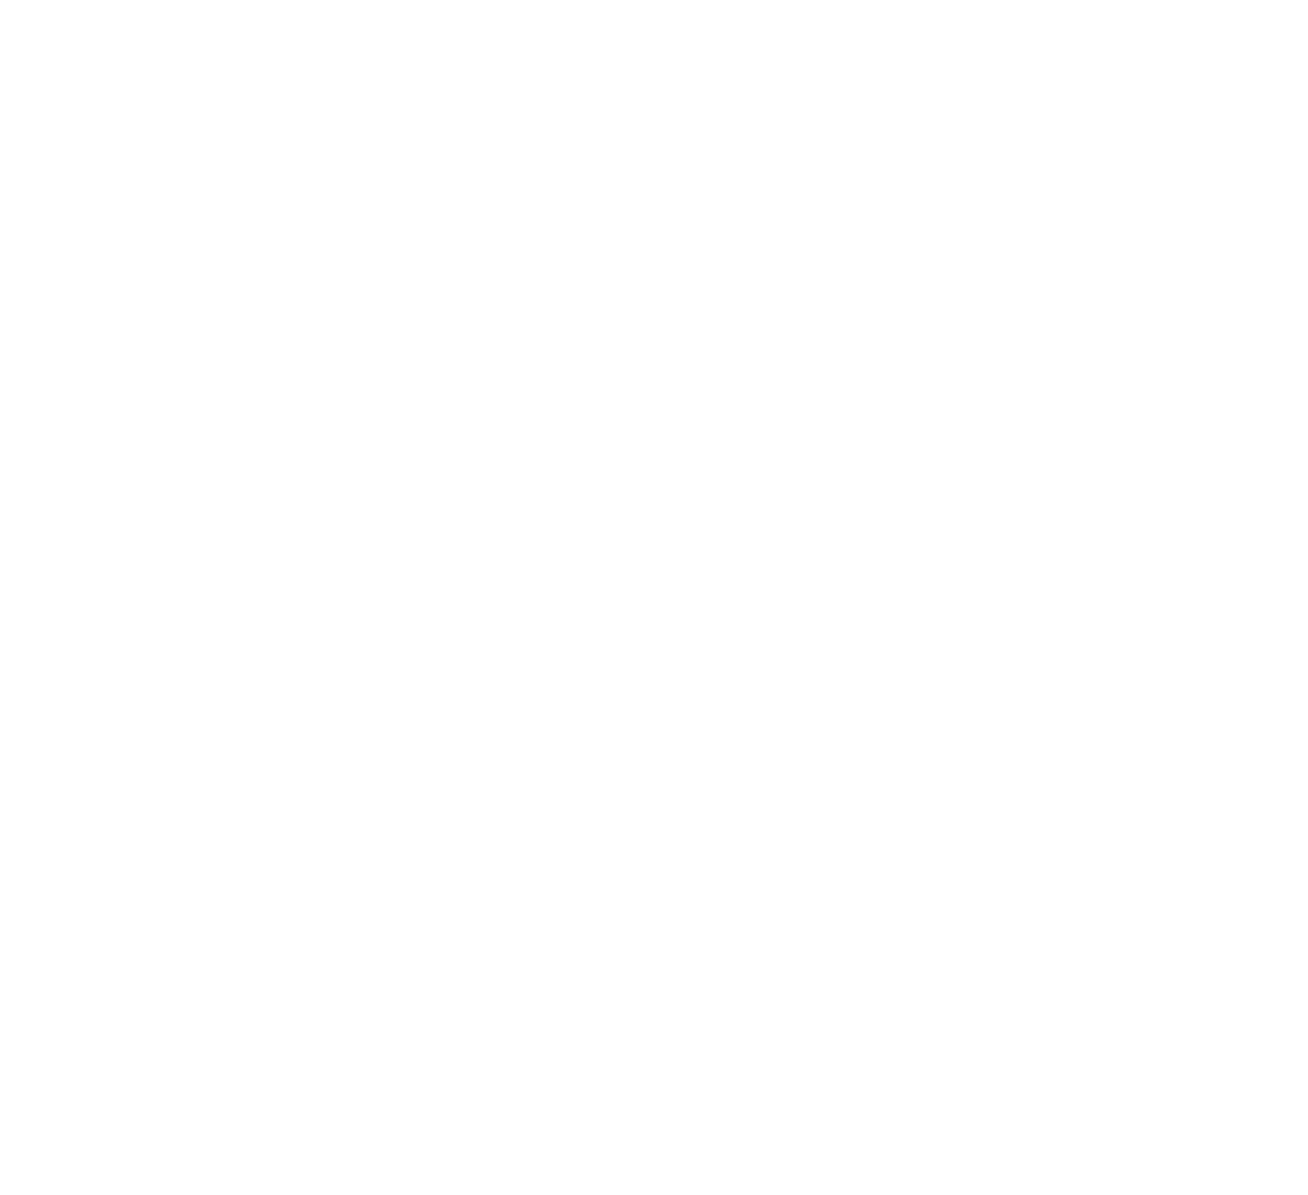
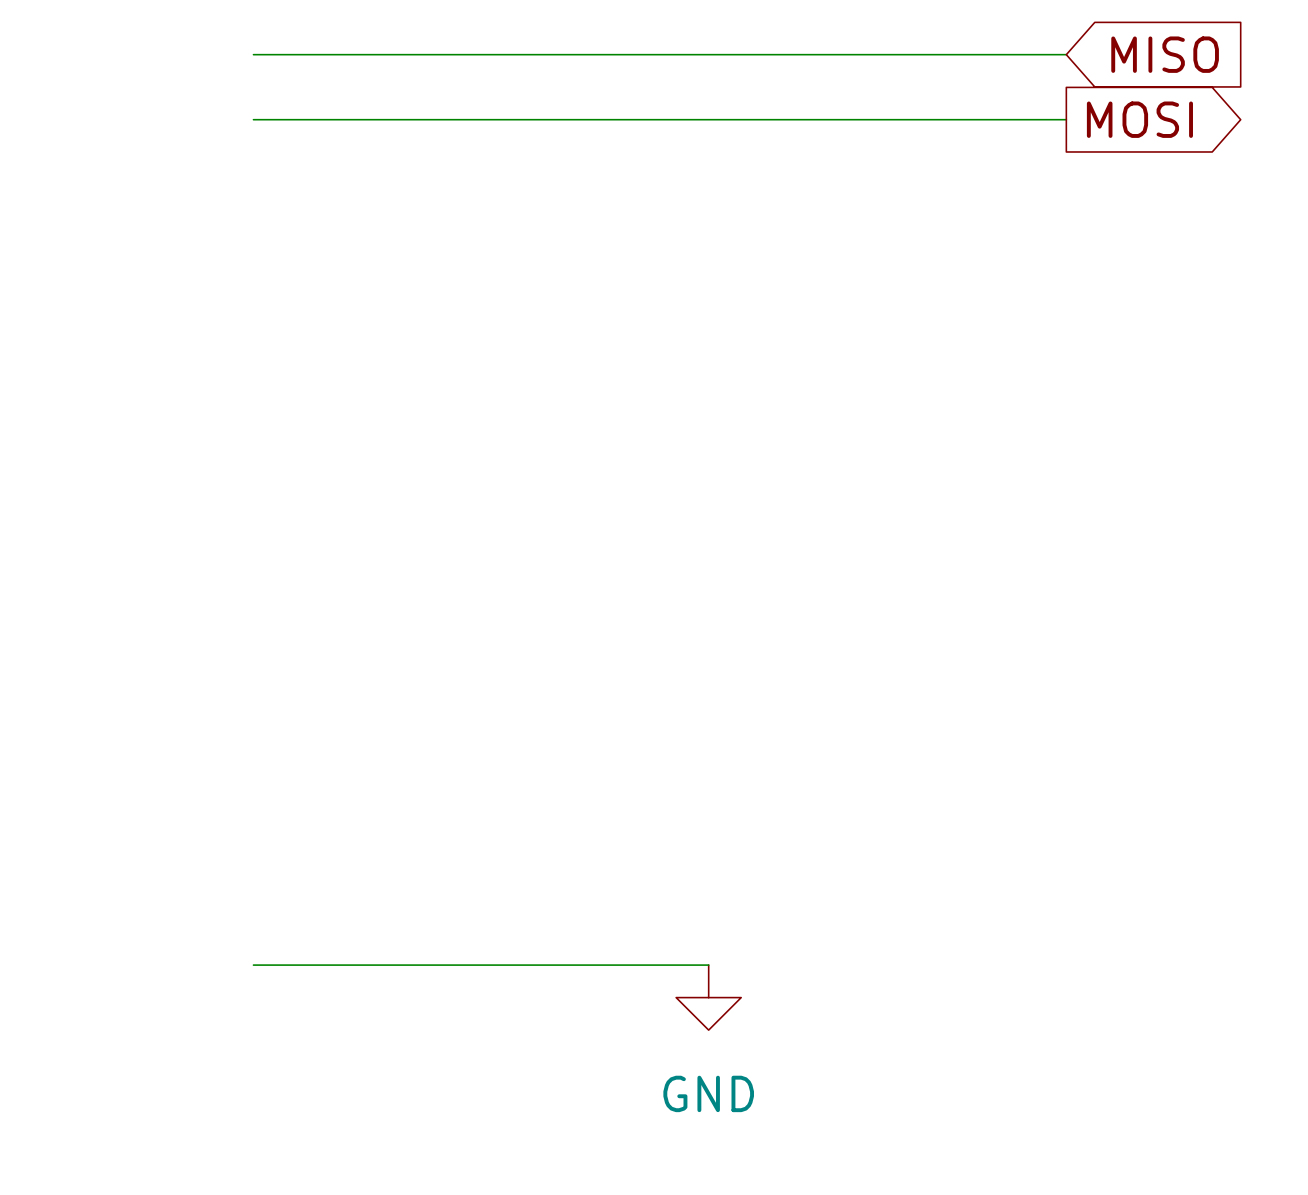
wire: none -> (253, 54) (1066, 54)
global label: none -> MISO (1165, 54)
wire: none -> (253, 119) (1066, 119)
global label: none -> MOSI (1139, 119)
wire: none -> (253, 965) (708, 965)
power symbol: none -> GND (708, 997)

